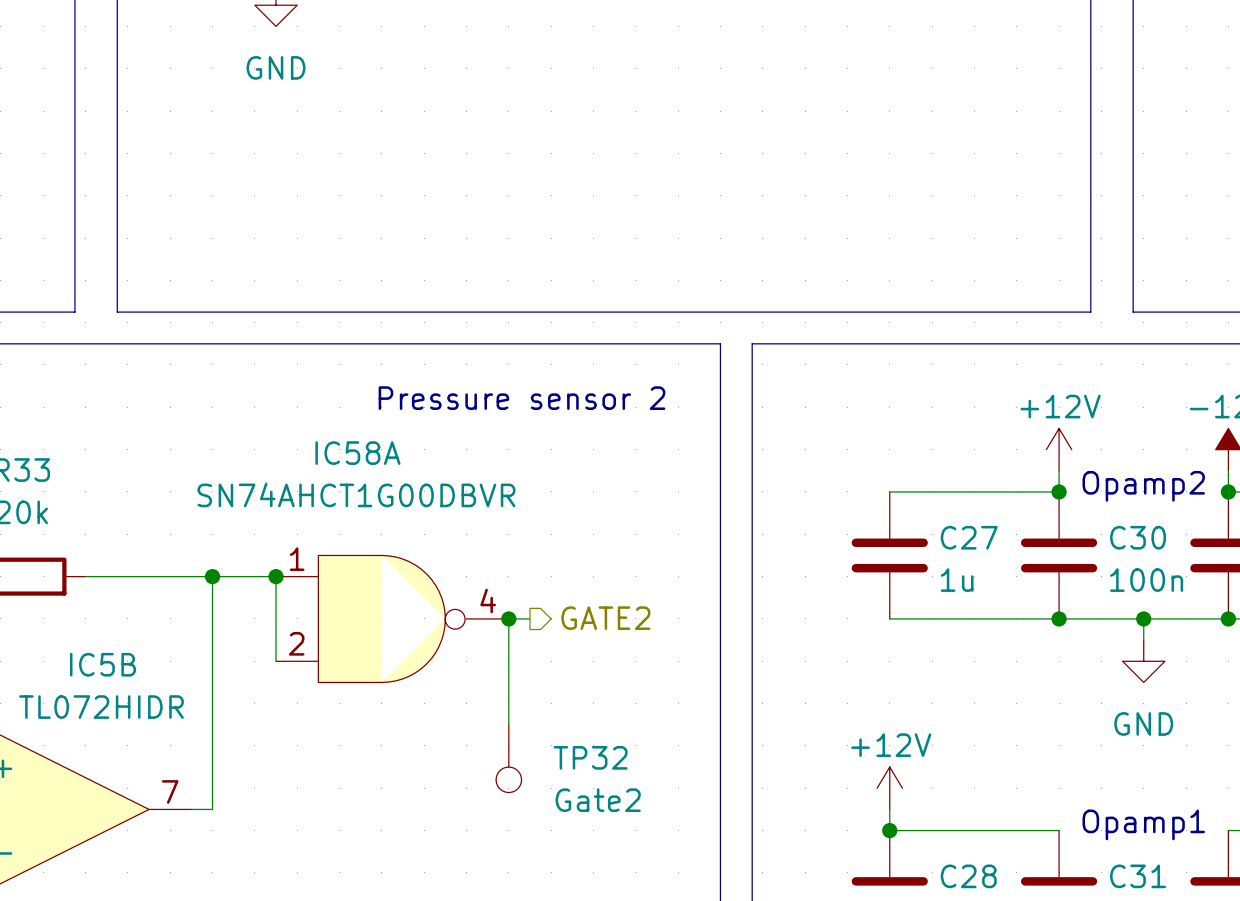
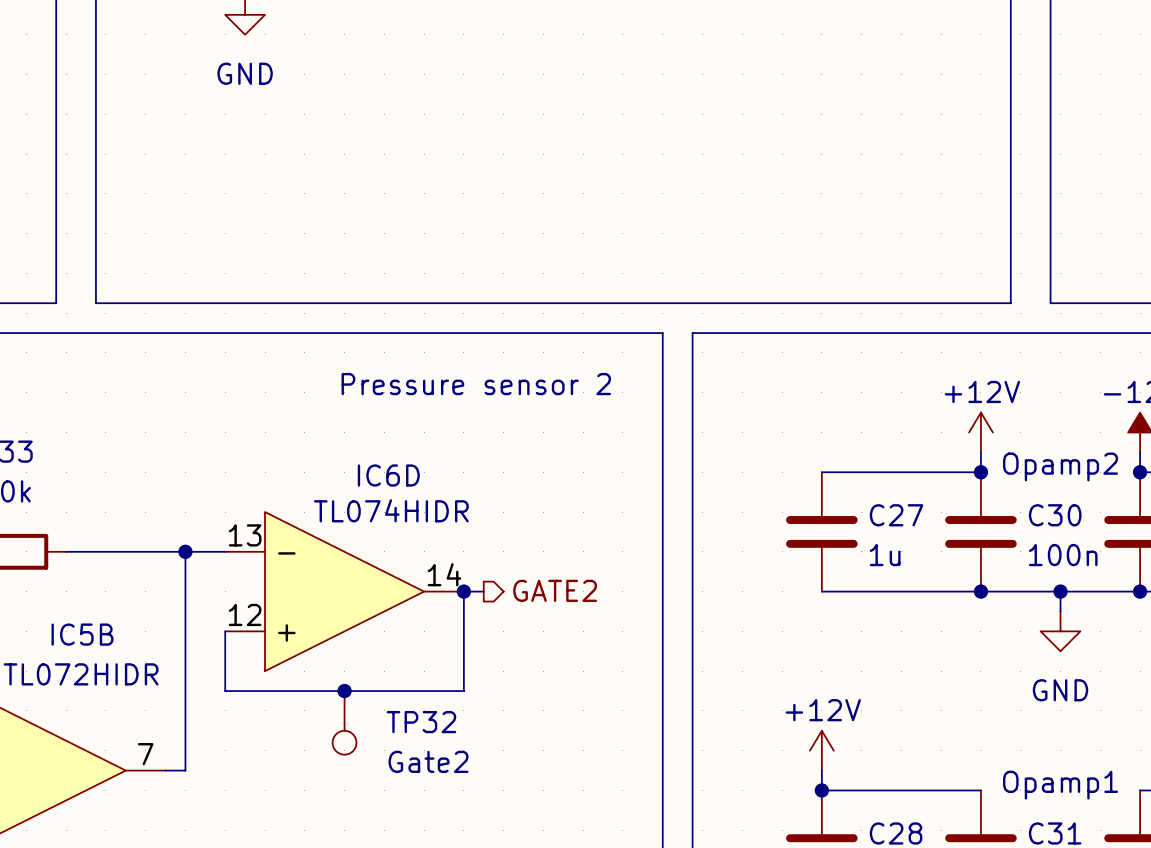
wire: (254, 576) (276, 576) (276, 661) -> none
junction: (276, 576) -> none
IC6D: none -> TL074HIDR (344, 591)
IC58A: SN74AHCT1G00DBVR (392, 618) -> none
wire: none -> (225, 631) (225, 691) (463, 691)
junction: none -> (344, 691)
TP32 position: (508, 758) -> (344, 722)

